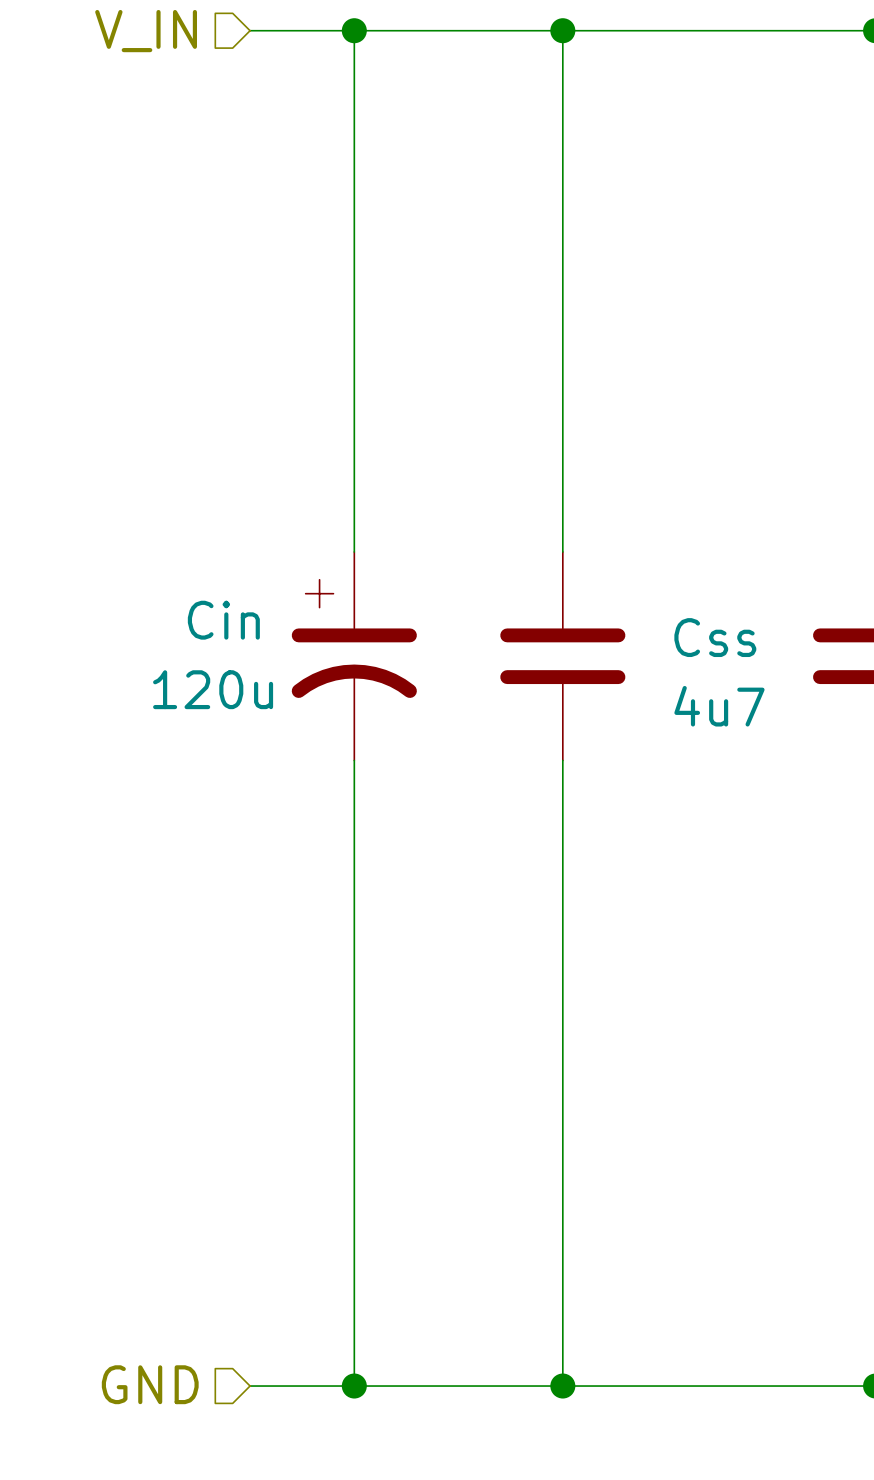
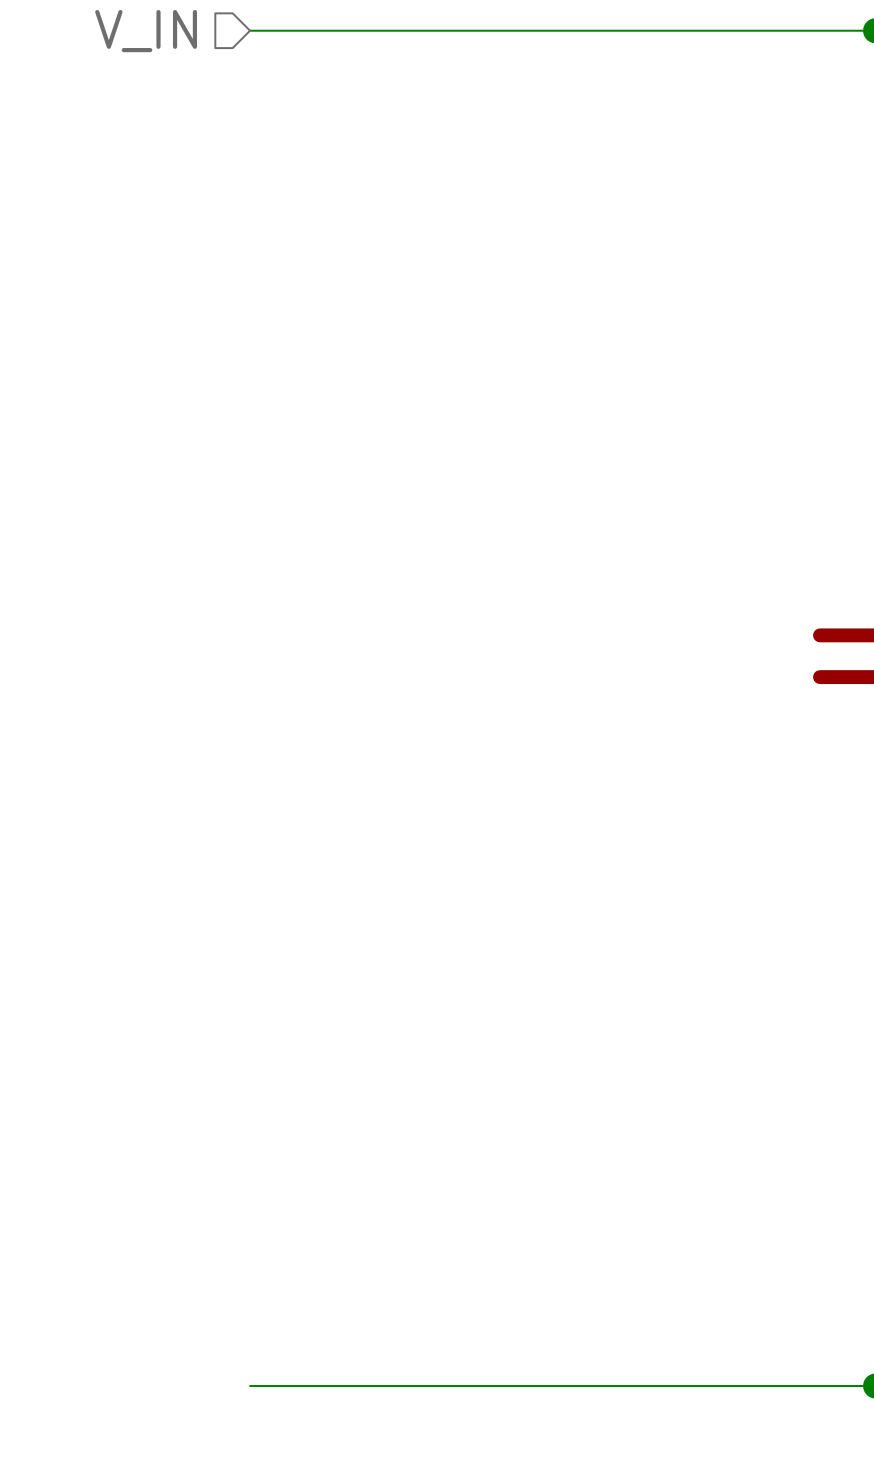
wire: (354, 30) (354, 551) -> none
junction: (354, 30) -> none
wire: (562, 30) (562, 551) -> none
junction: (562, 30) -> none
Cin: 120u (354, 656) -> none
Css: 4u7 (562, 656) -> none
wire: (354, 760) (354, 1386) -> none
wire: (562, 760) (562, 1386) -> none
hierarchical label: GND (150, 1384) -> none
junction: (354, 1386) -> none
junction: (562, 1386) -> none

